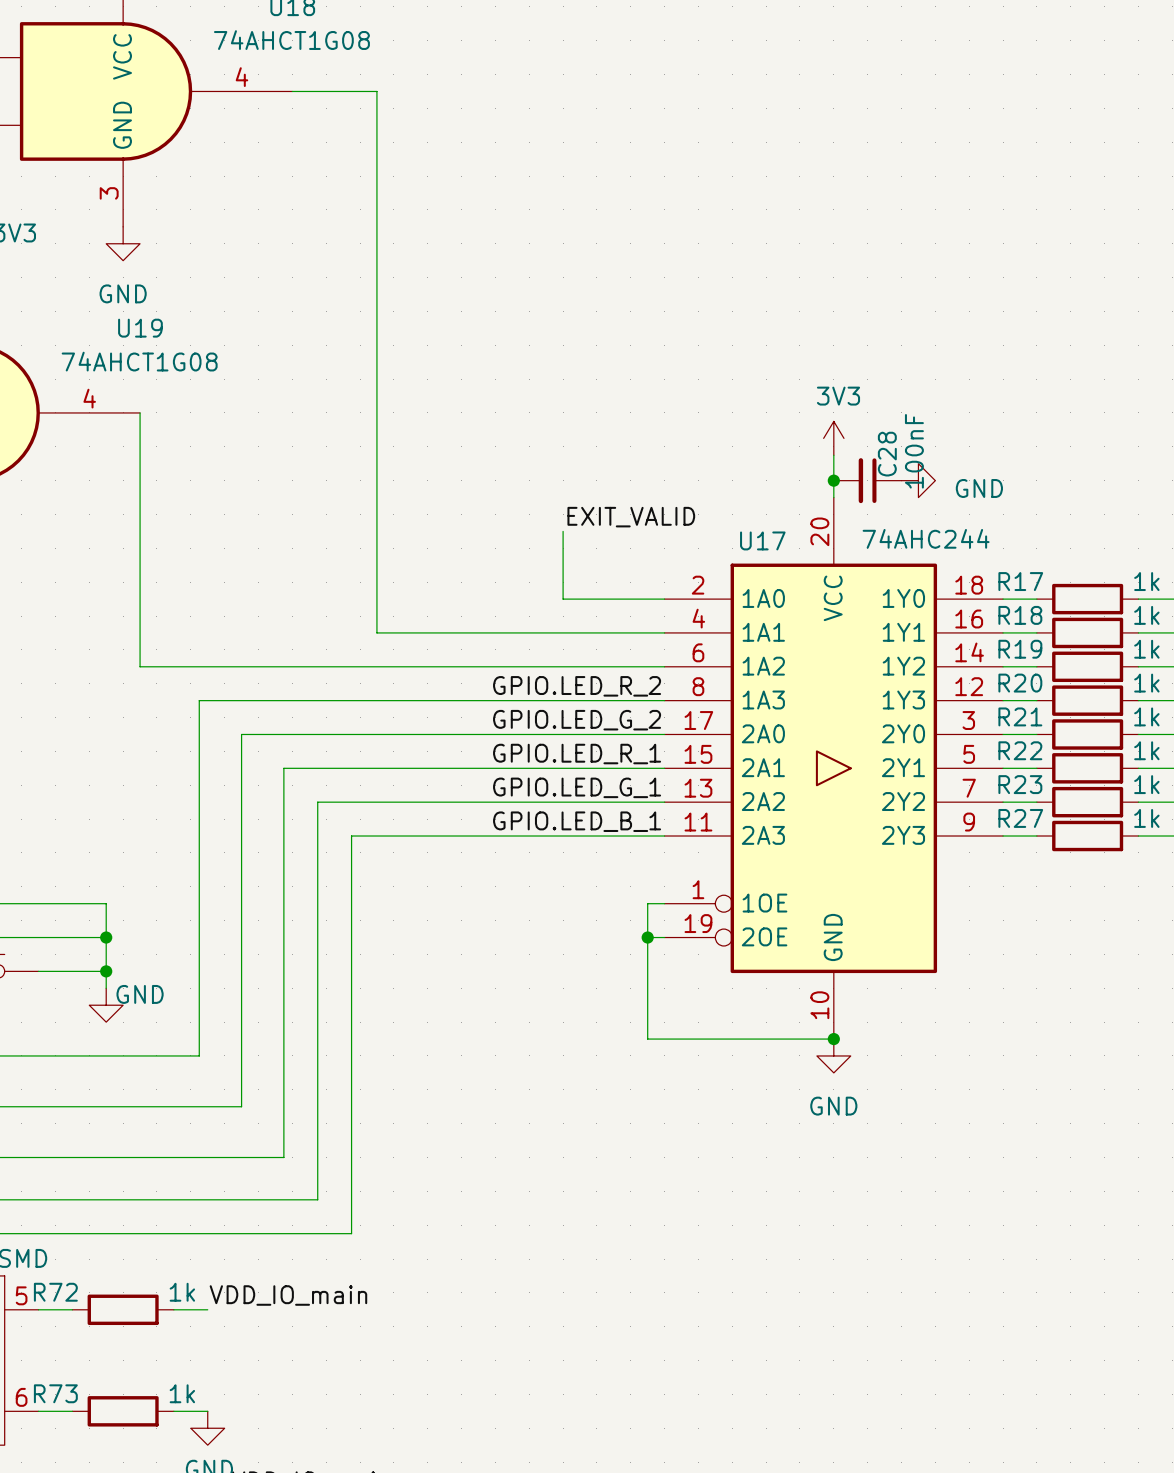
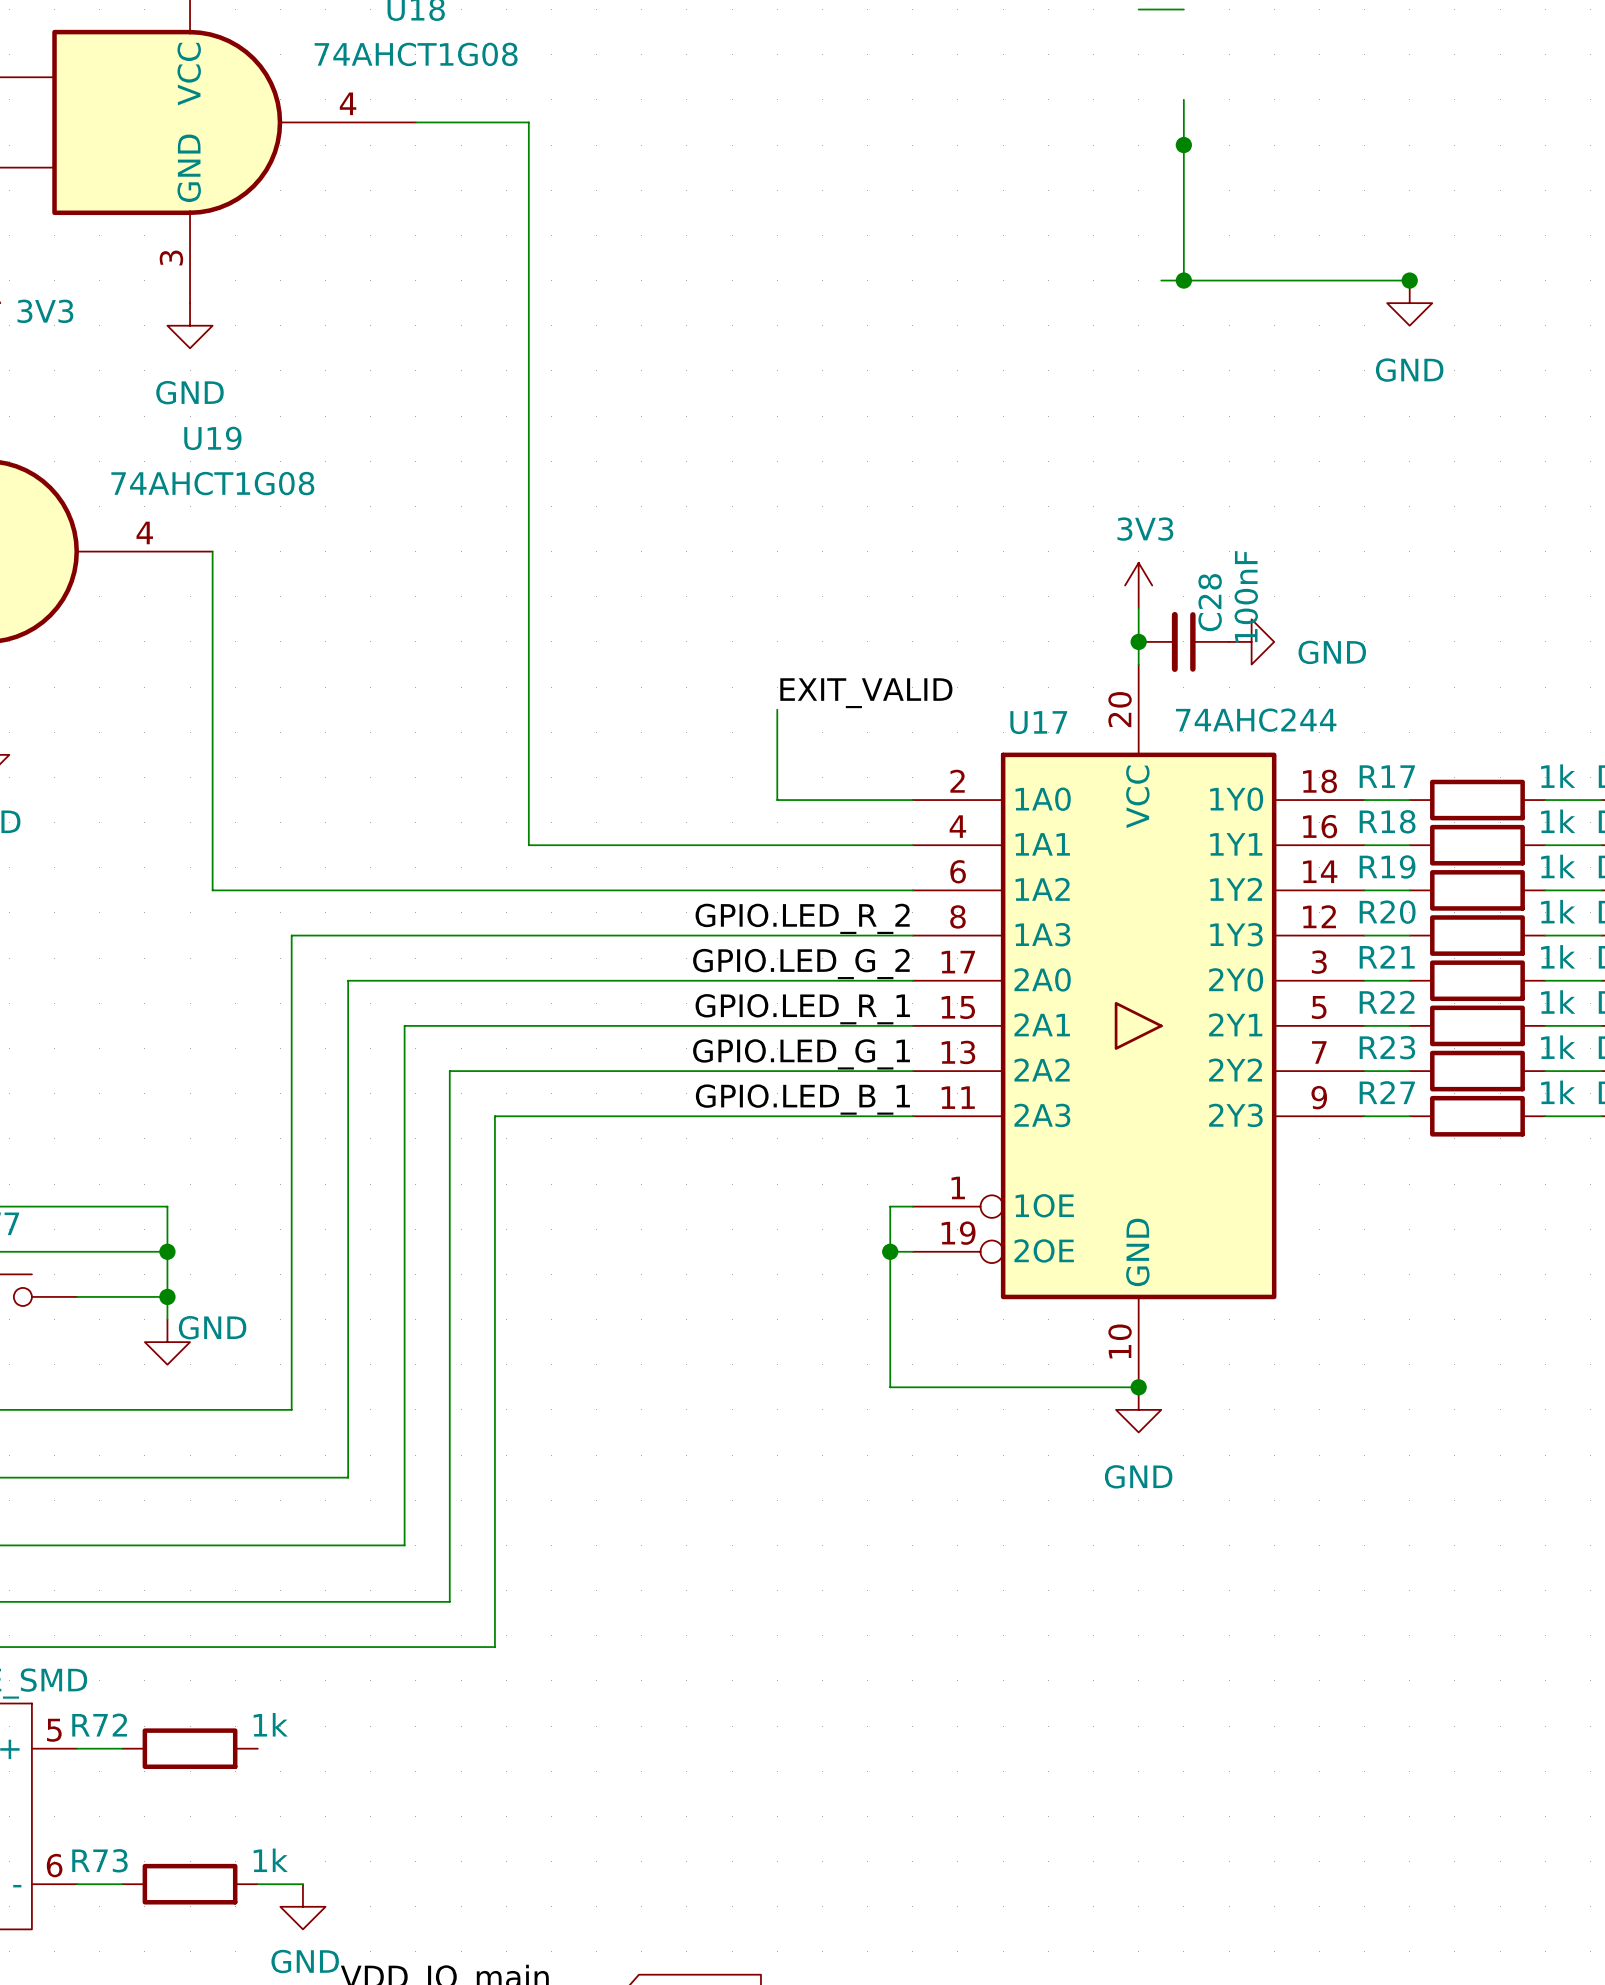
wire: none -> (1138, 9) (1183, 9)
wire: none -> (1183, 99) (1183, 280)
junction: none -> (1183, 145)
wire: none -> (1161, 280) (1409, 280)
junction: none -> (1183, 280)
junction: none -> (1409, 280)
power symbol: none -> GND (1409, 303)
label: VDD_IO_main (288, 1295) -> none
wire: (173, 1309) (207, 1309) -> none

